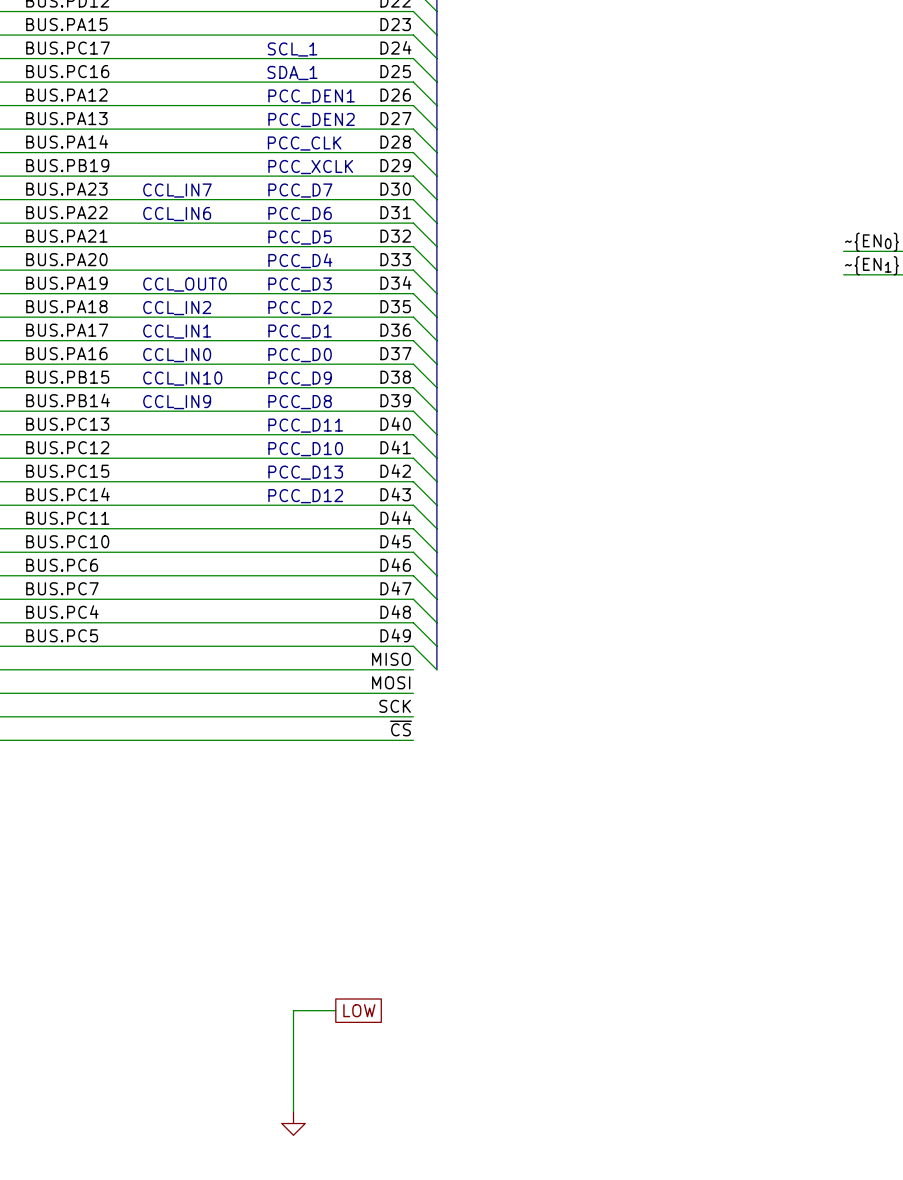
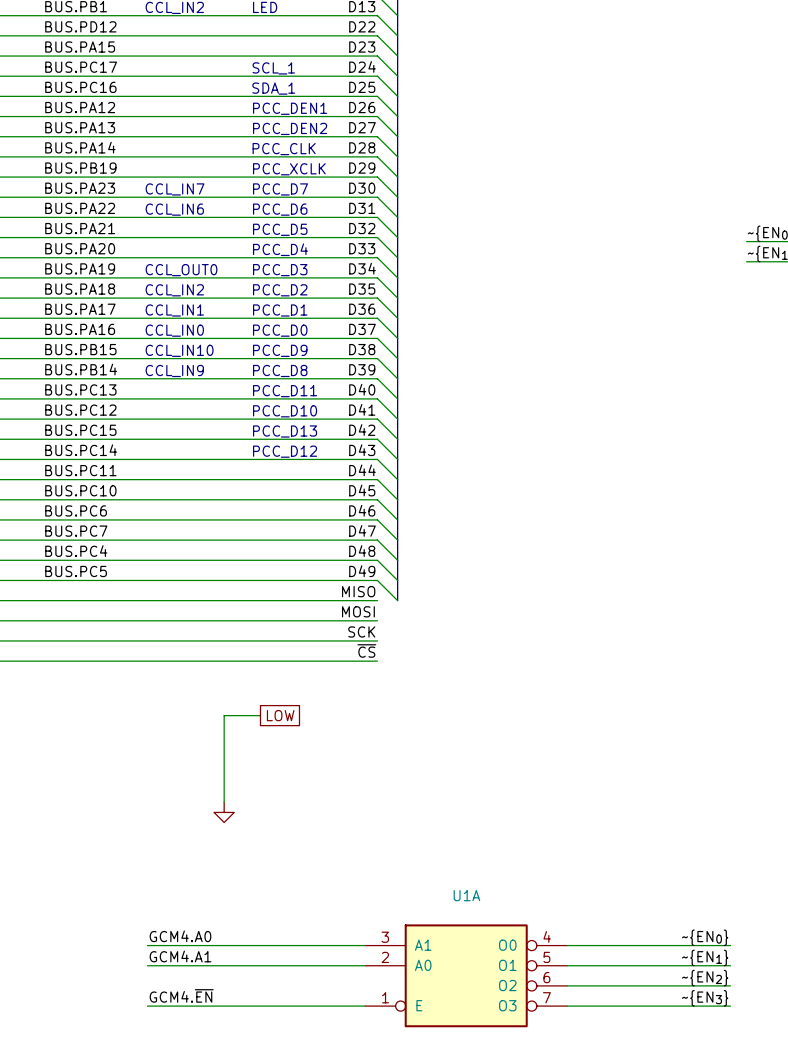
wire: (335, 1010) (293, 1010) (293, 1111) -> (260, 715) (224, 715) (224, 802)
global label position: LOW (359, 1010) -> LOW (280, 715)
label: none -> GCM4.A0 (180, 936)
label: none -> ~{EN0} (705, 937)
wire: none -> (147, 945) (365, 945)
wire: none -> (567, 945) (730, 945)
label: none -> GCM4.A1 (180, 956)
label: none -> ~{EN1} (705, 957)
wire: none -> (147, 965) (365, 965)
wire: none -> (567, 965) (730, 965)
U1A: none -> (466, 975)
label: none -> ~{EN2} (705, 978)
wire: none -> (567, 985) (730, 985)
power symbol position: (293, 1123) -> (224, 812)
label: none -> GCM4.~{EN} (181, 995)
label: none -> ~{EN3} (705, 998)
wire: none -> (147, 1006) (365, 1006)
wire: none -> (567, 1006) (730, 1006)

